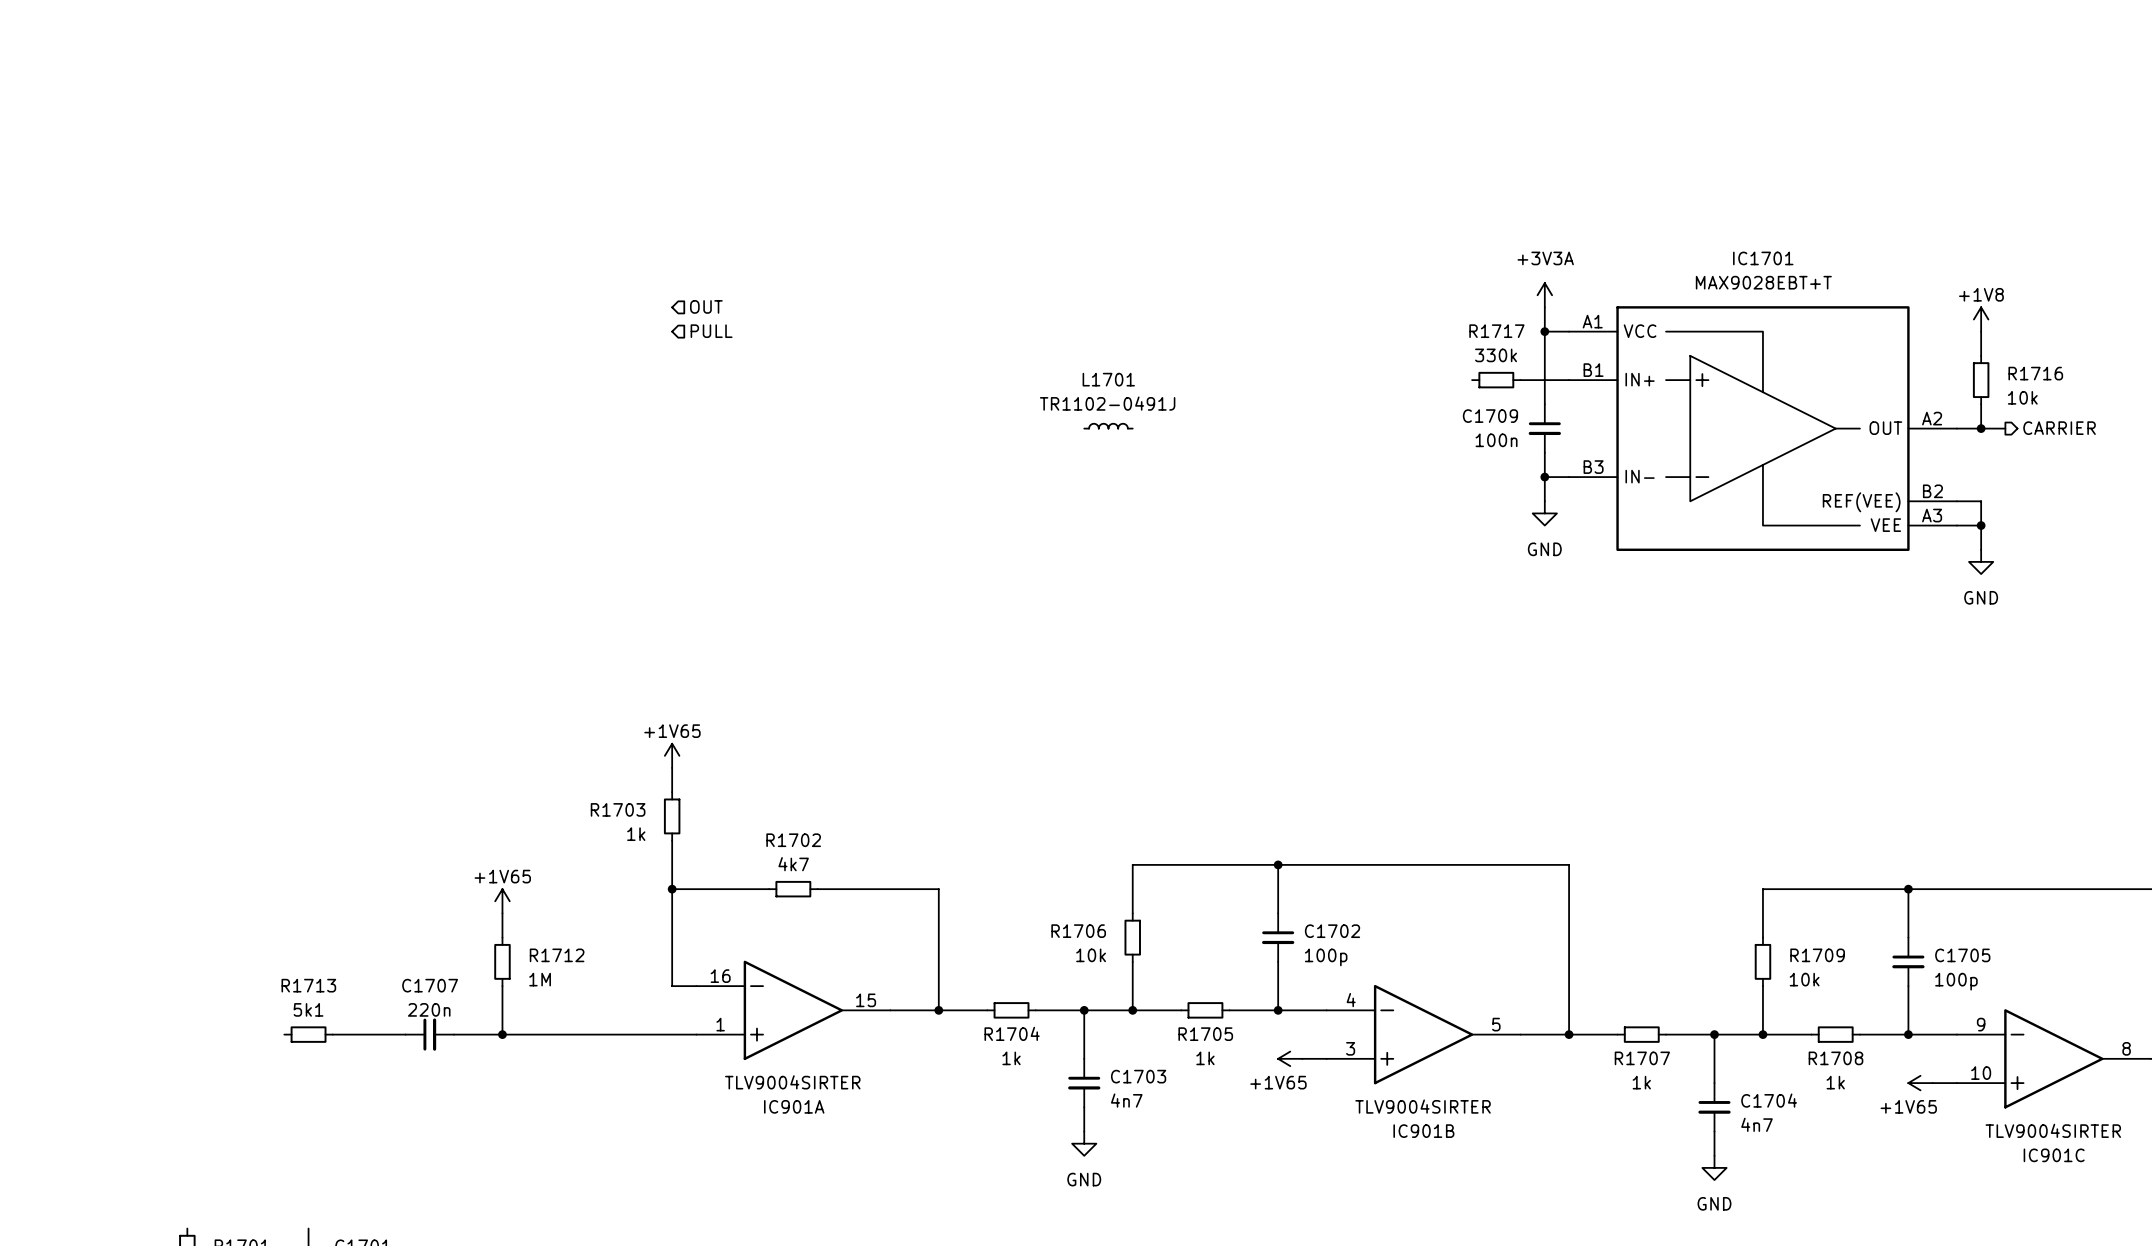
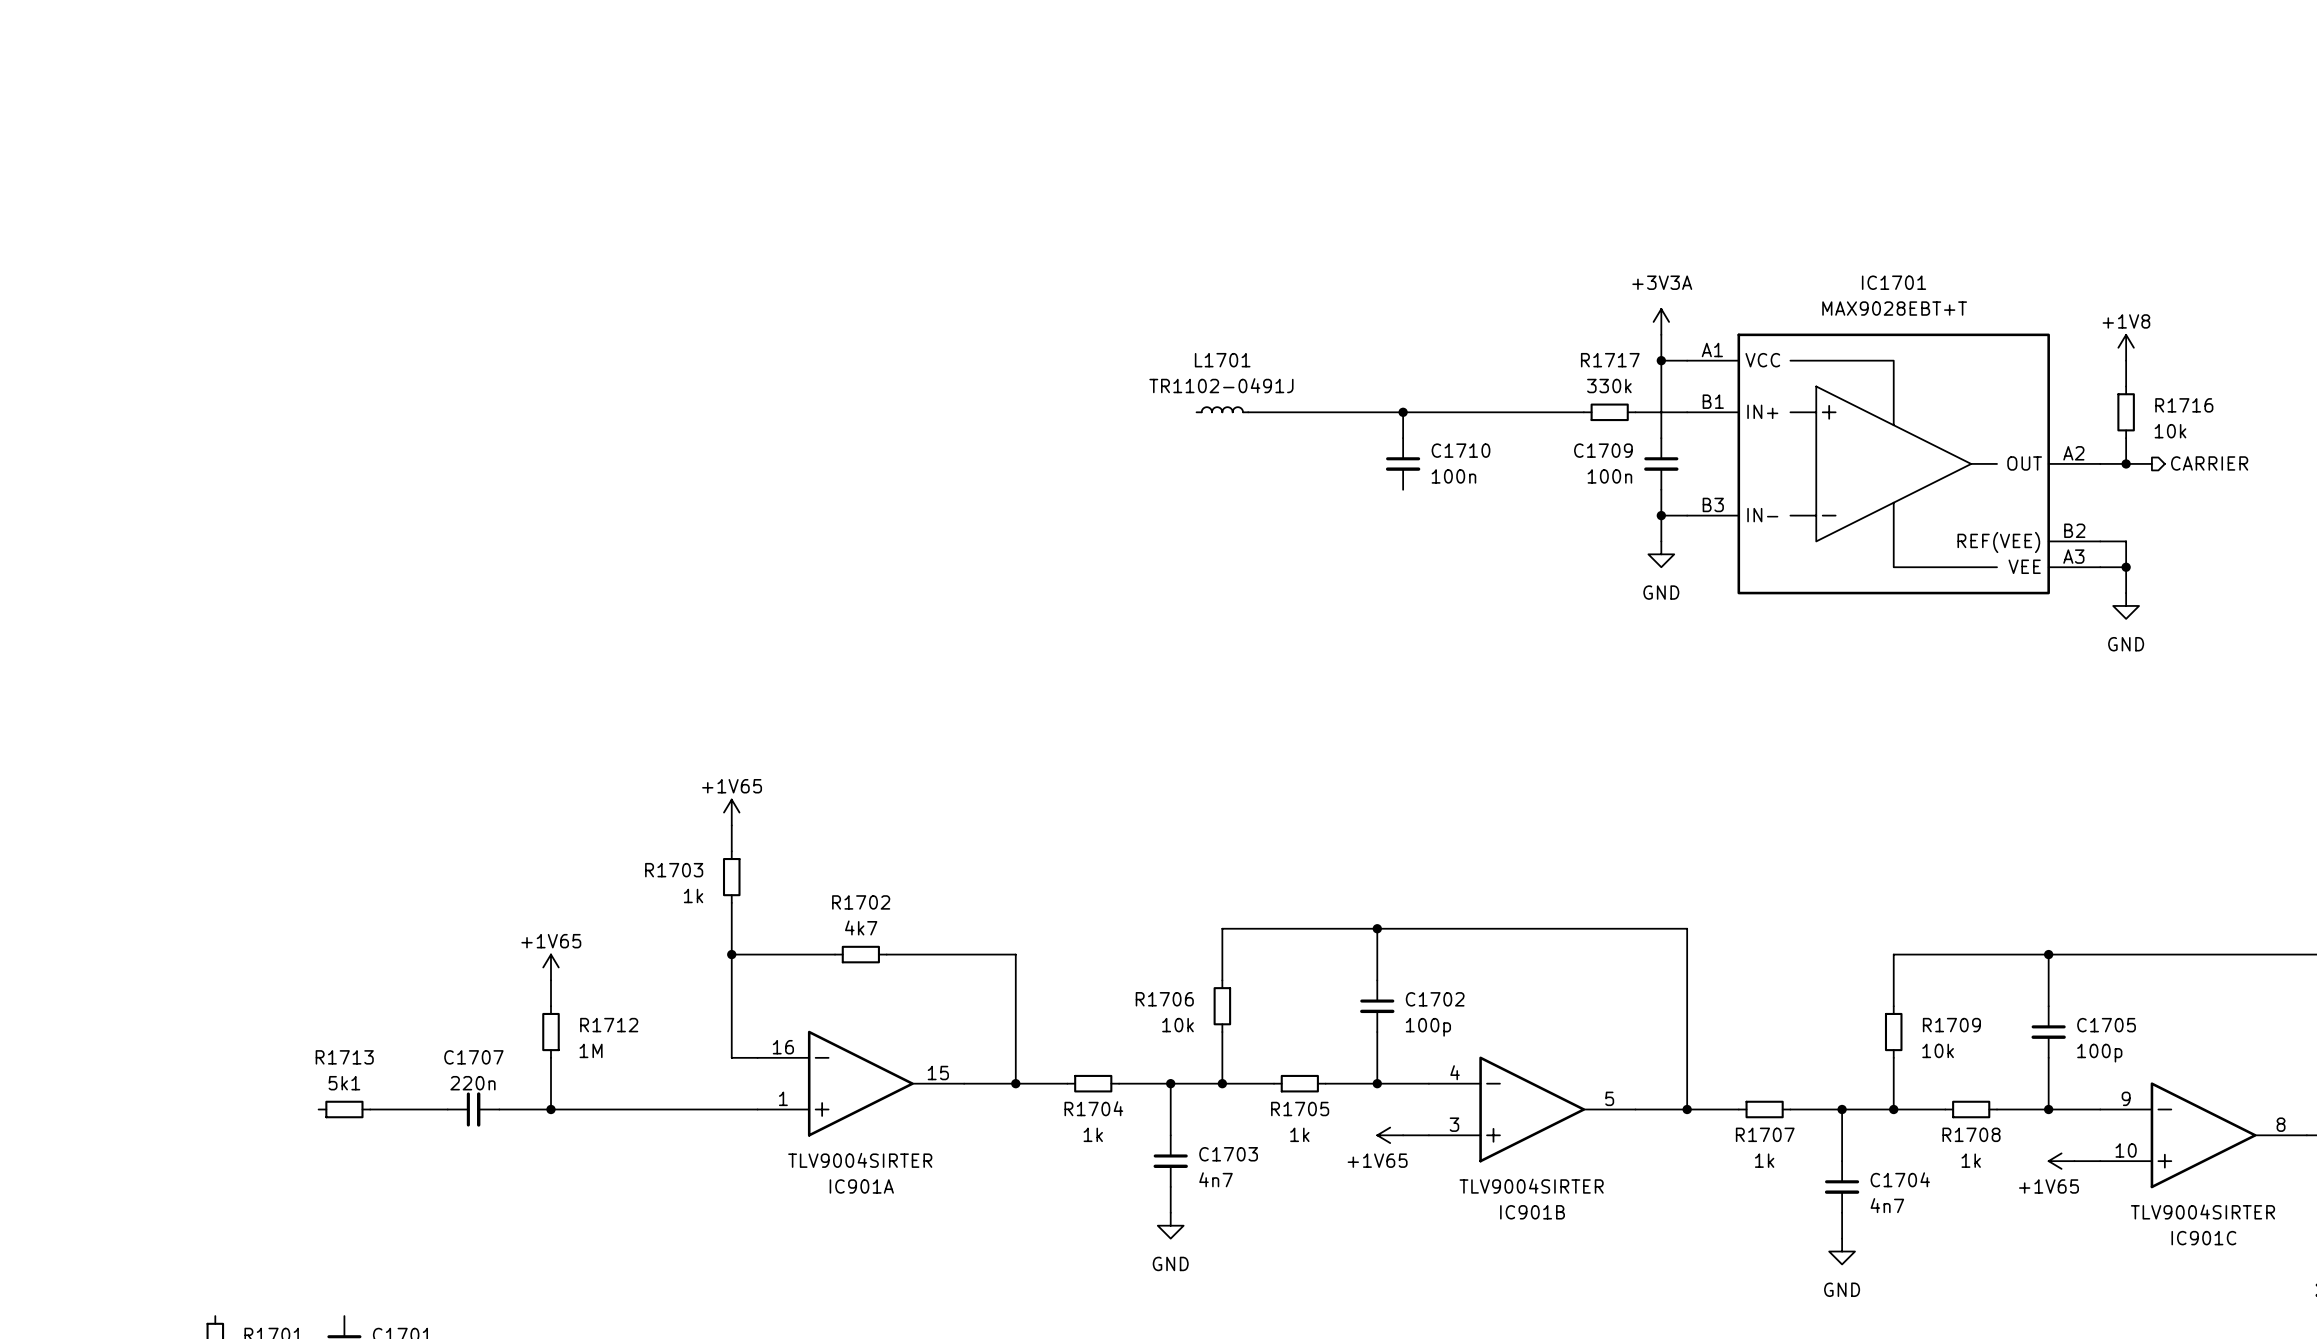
hierarchical label: OUT (706, 306) -> none
hierarchical label: PULL (711, 331) -> none
wire: none -> (1248, 412) (1583, 412)
wire: none -> (1403, 412) (1403, 438)
junction: none -> (1403, 412)
L1701 position: (1108, 426) -> (1222, 409)
C1710: none -> 100n (1403, 463)

